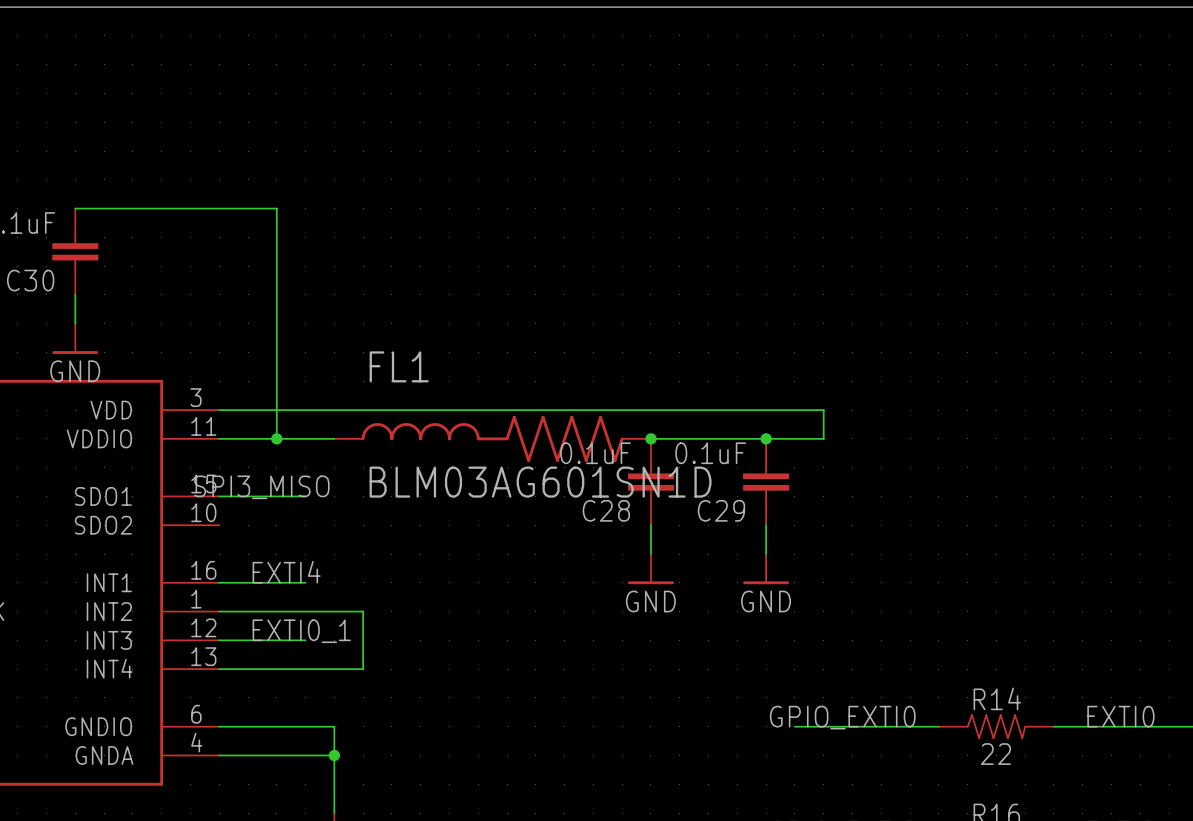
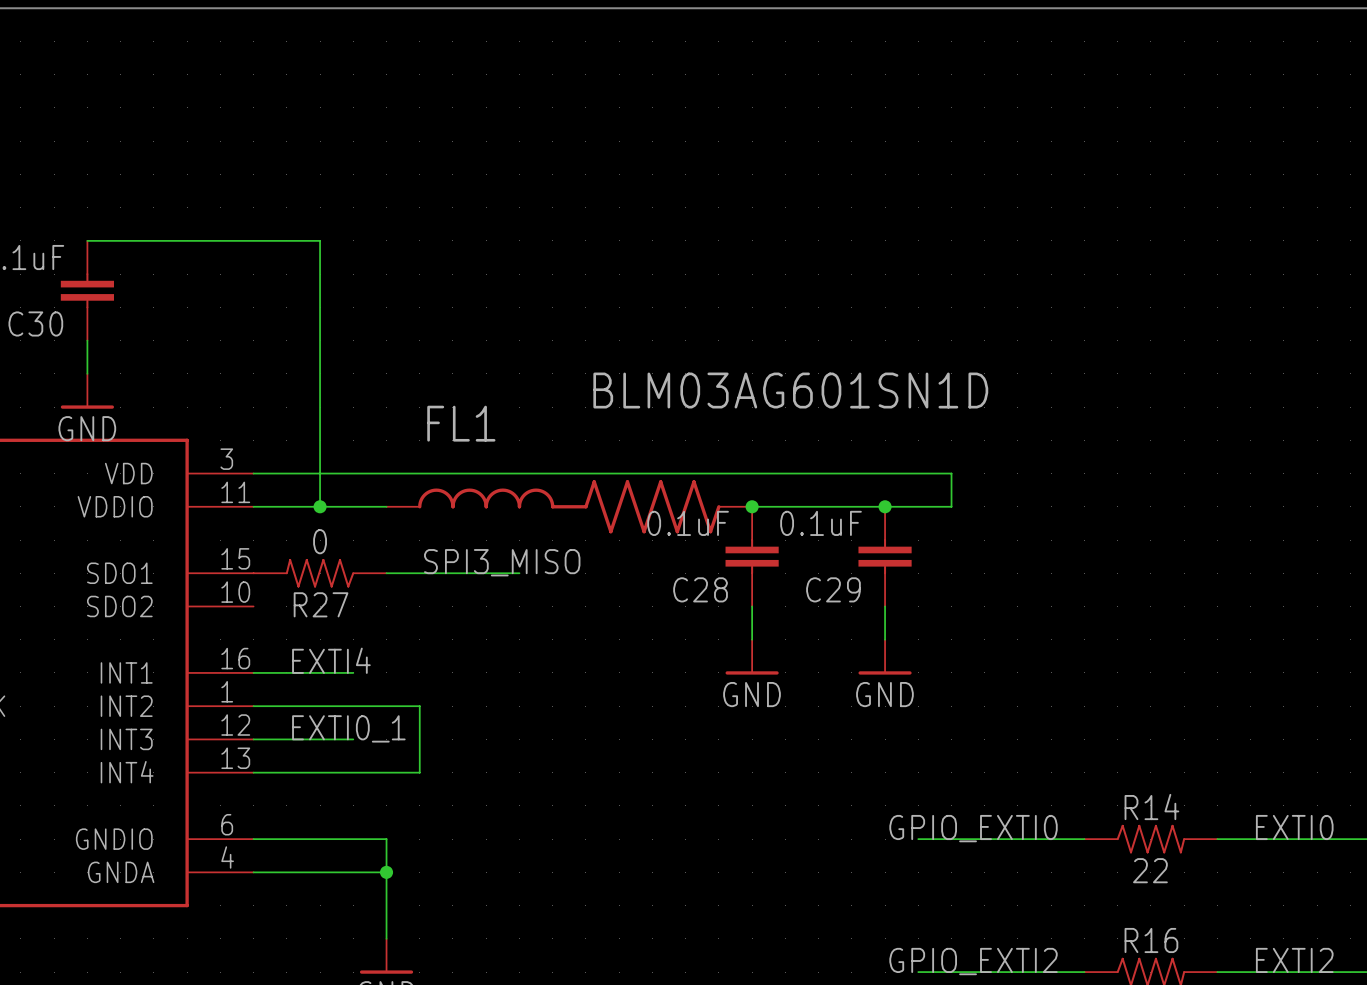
FL1 value position: BLM03AG601SN1D (540, 482) -> BLM03AG601SN1D (790, 390)
label position: SPI3_MISO (261, 487) -> SPI3_MISO (502, 562)
wire: (219, 496) (305, 496) -> none
R27: none -> 0 (320, 573)
wire: none -> (386, 573) (519, 573)

